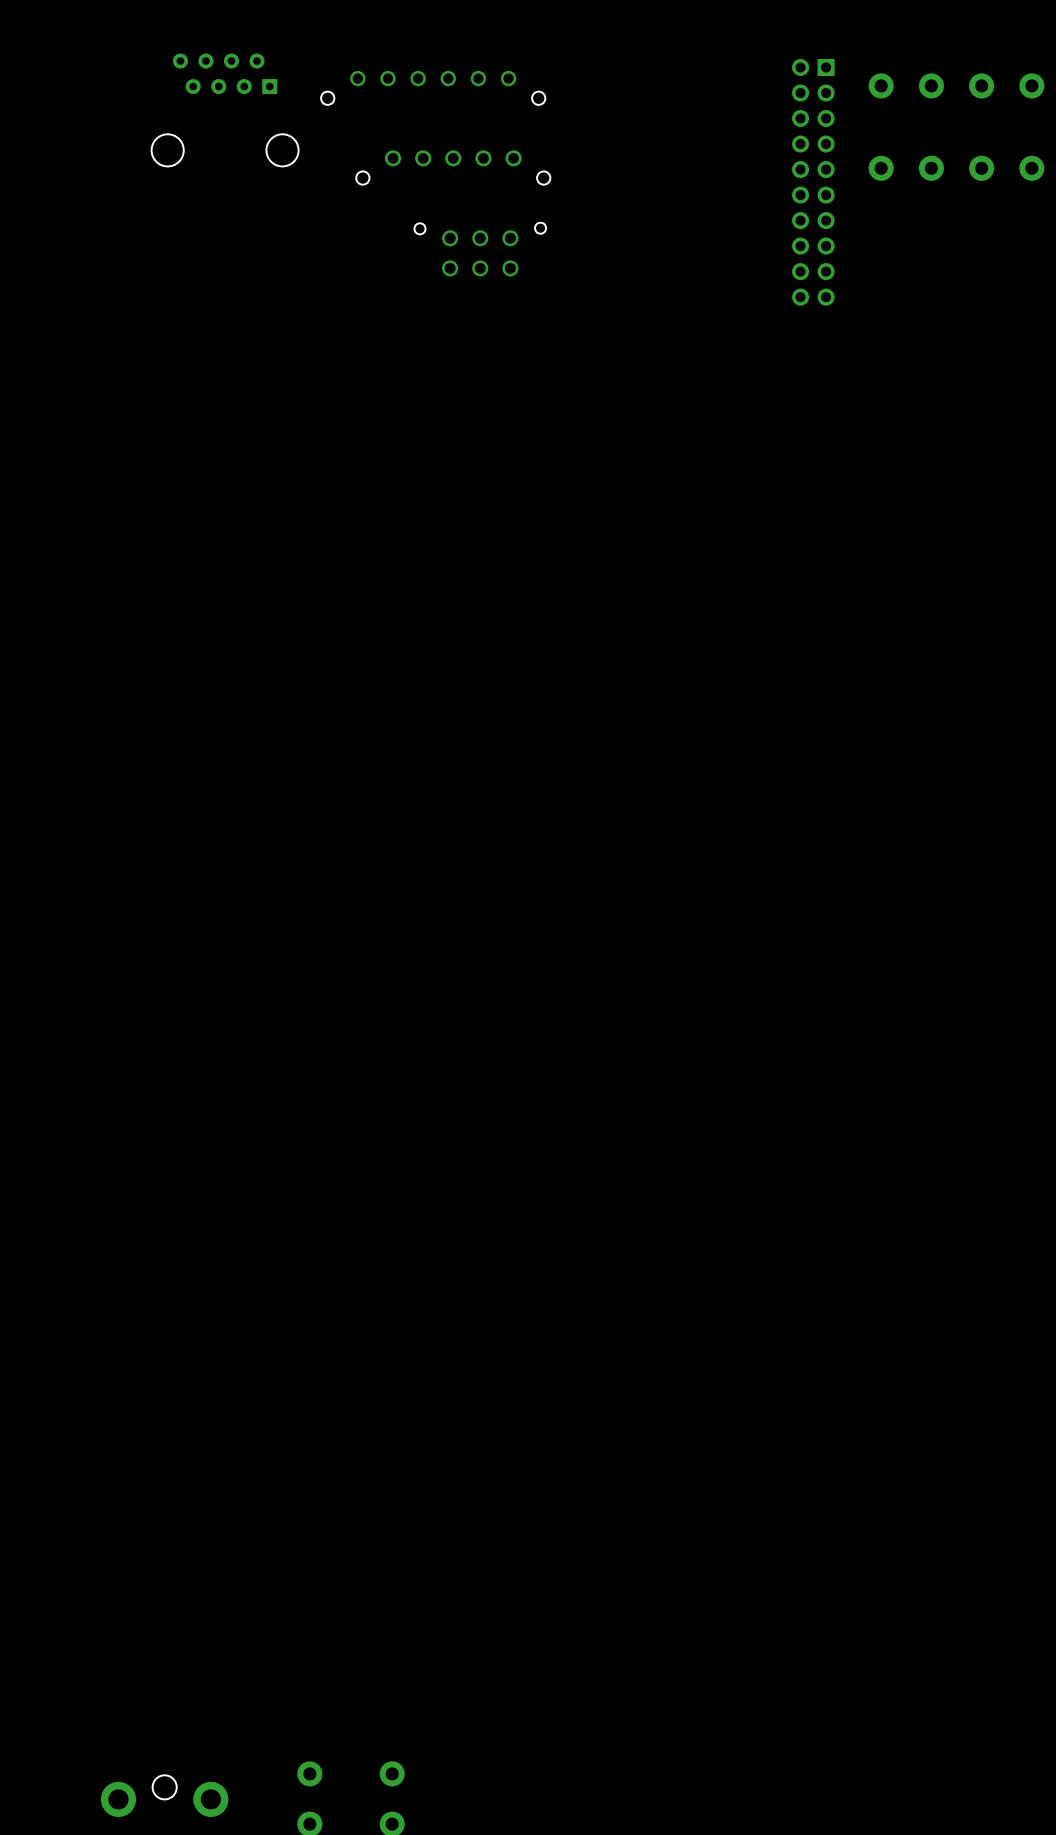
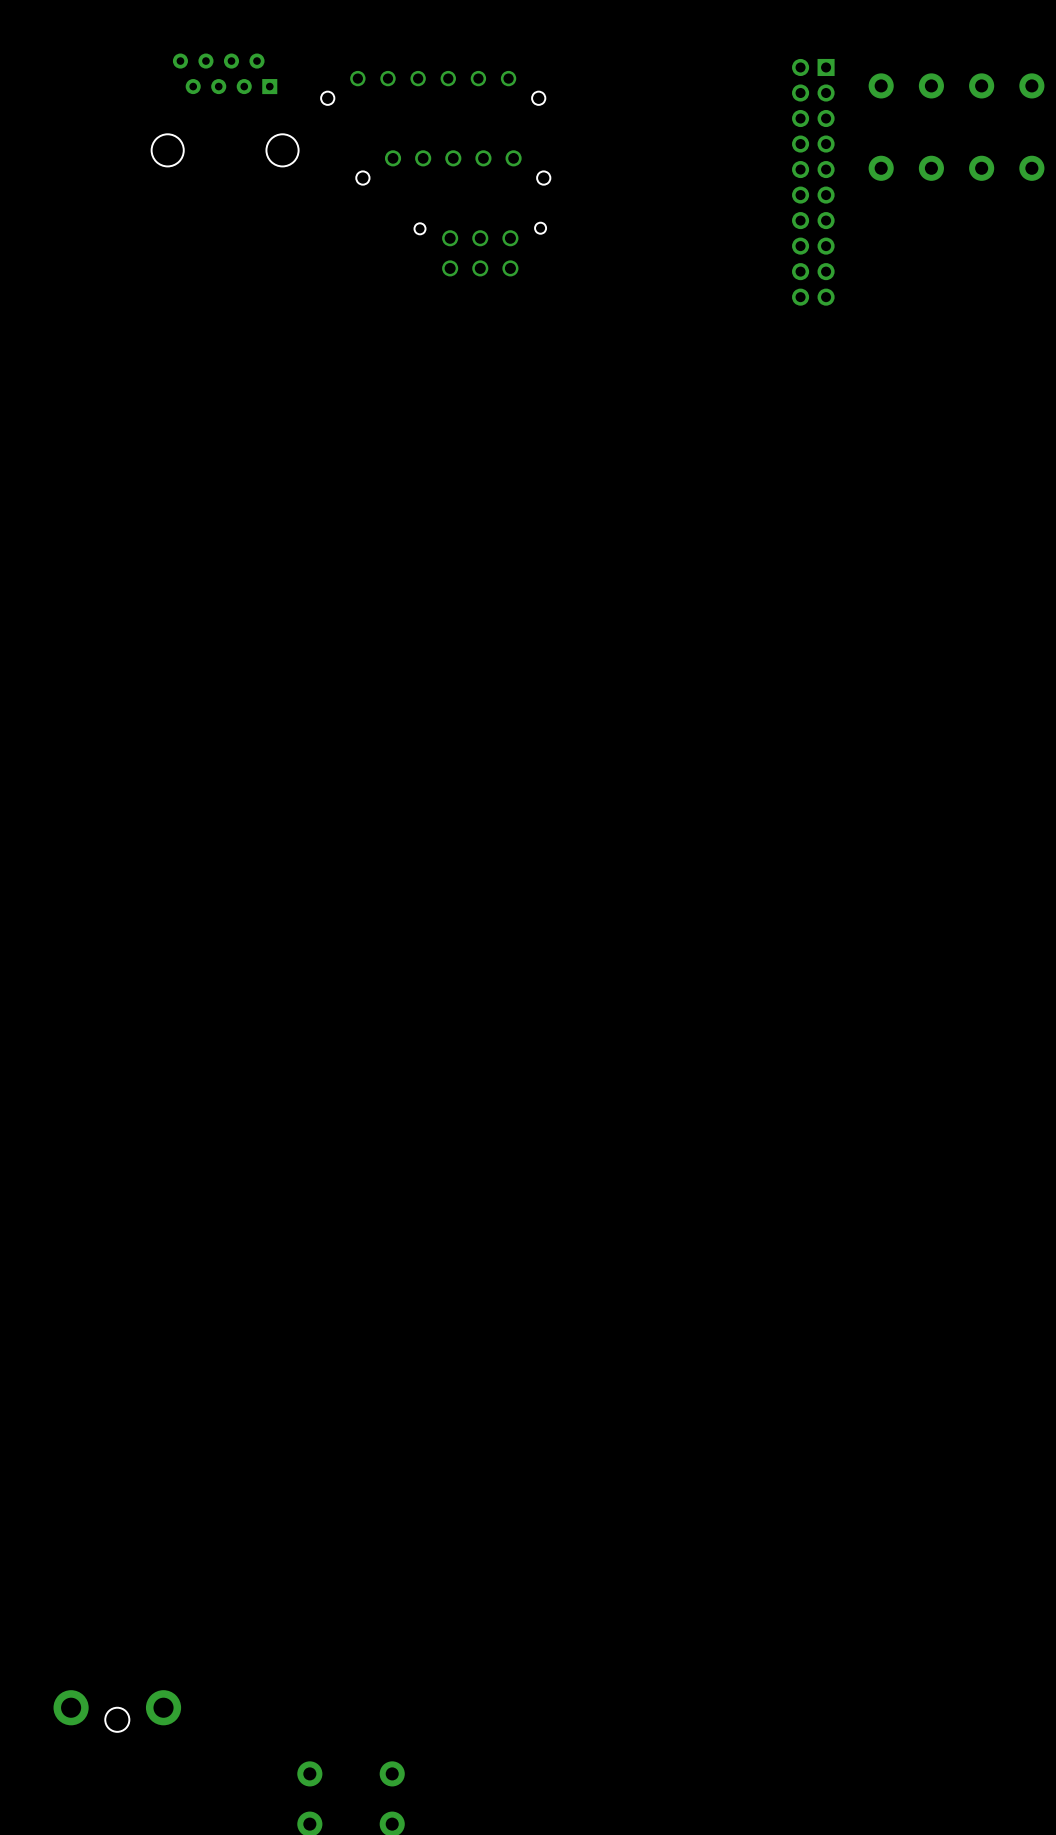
part rotation: 0° (164, 1796) -> 180° (117, 1711)
part position: (164, 1796) -> (117, 1711)

